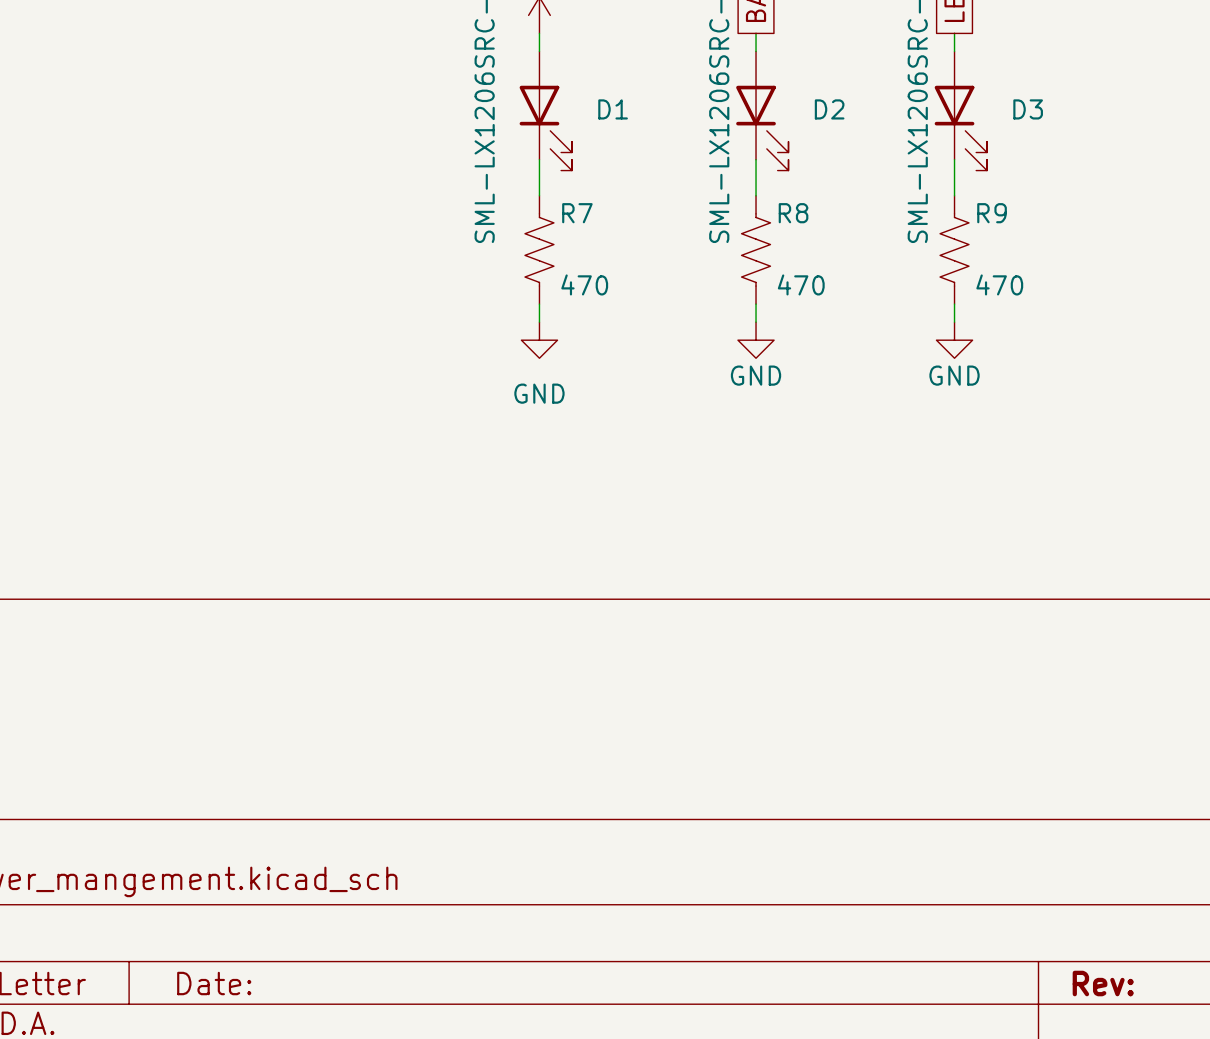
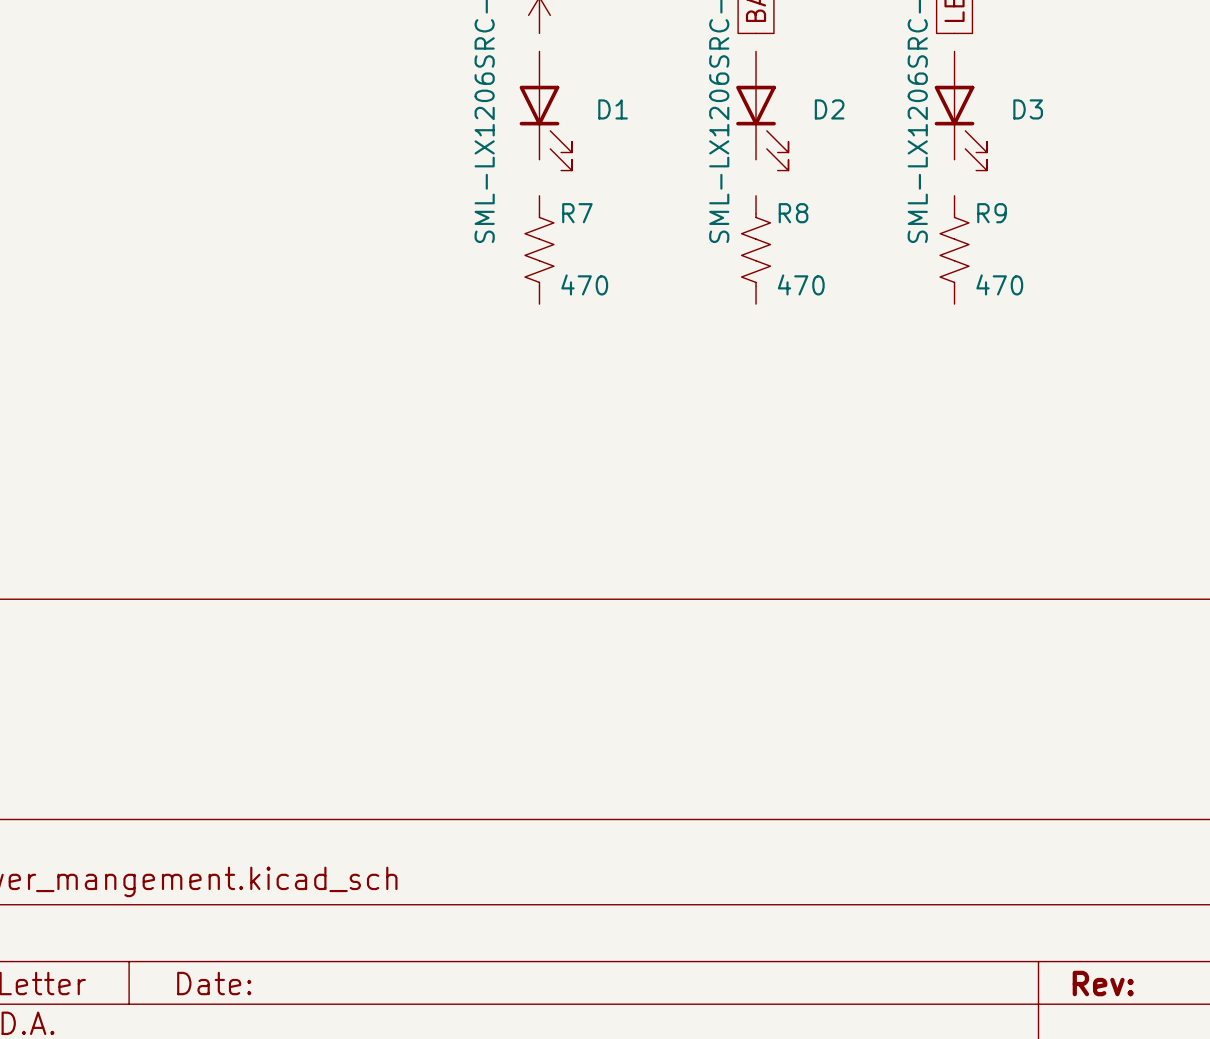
wire: (539, 33) (539, 51) -> none
wire: (756, 33) (756, 51) -> none
wire: (954, 33) (954, 51) -> none
wire: (539, 159) (539, 195) -> none
wire: (756, 159) (756, 195) -> none
wire: (954, 159) (954, 195) -> none
wire: (539, 304) (539, 322) -> none
wire: (756, 304) (756, 322) -> none
wire: (954, 304) (954, 322) -> none
power symbol: GND (539, 340) -> none
power symbol: GND (756, 340) -> none
power symbol: GND (954, 340) -> none

